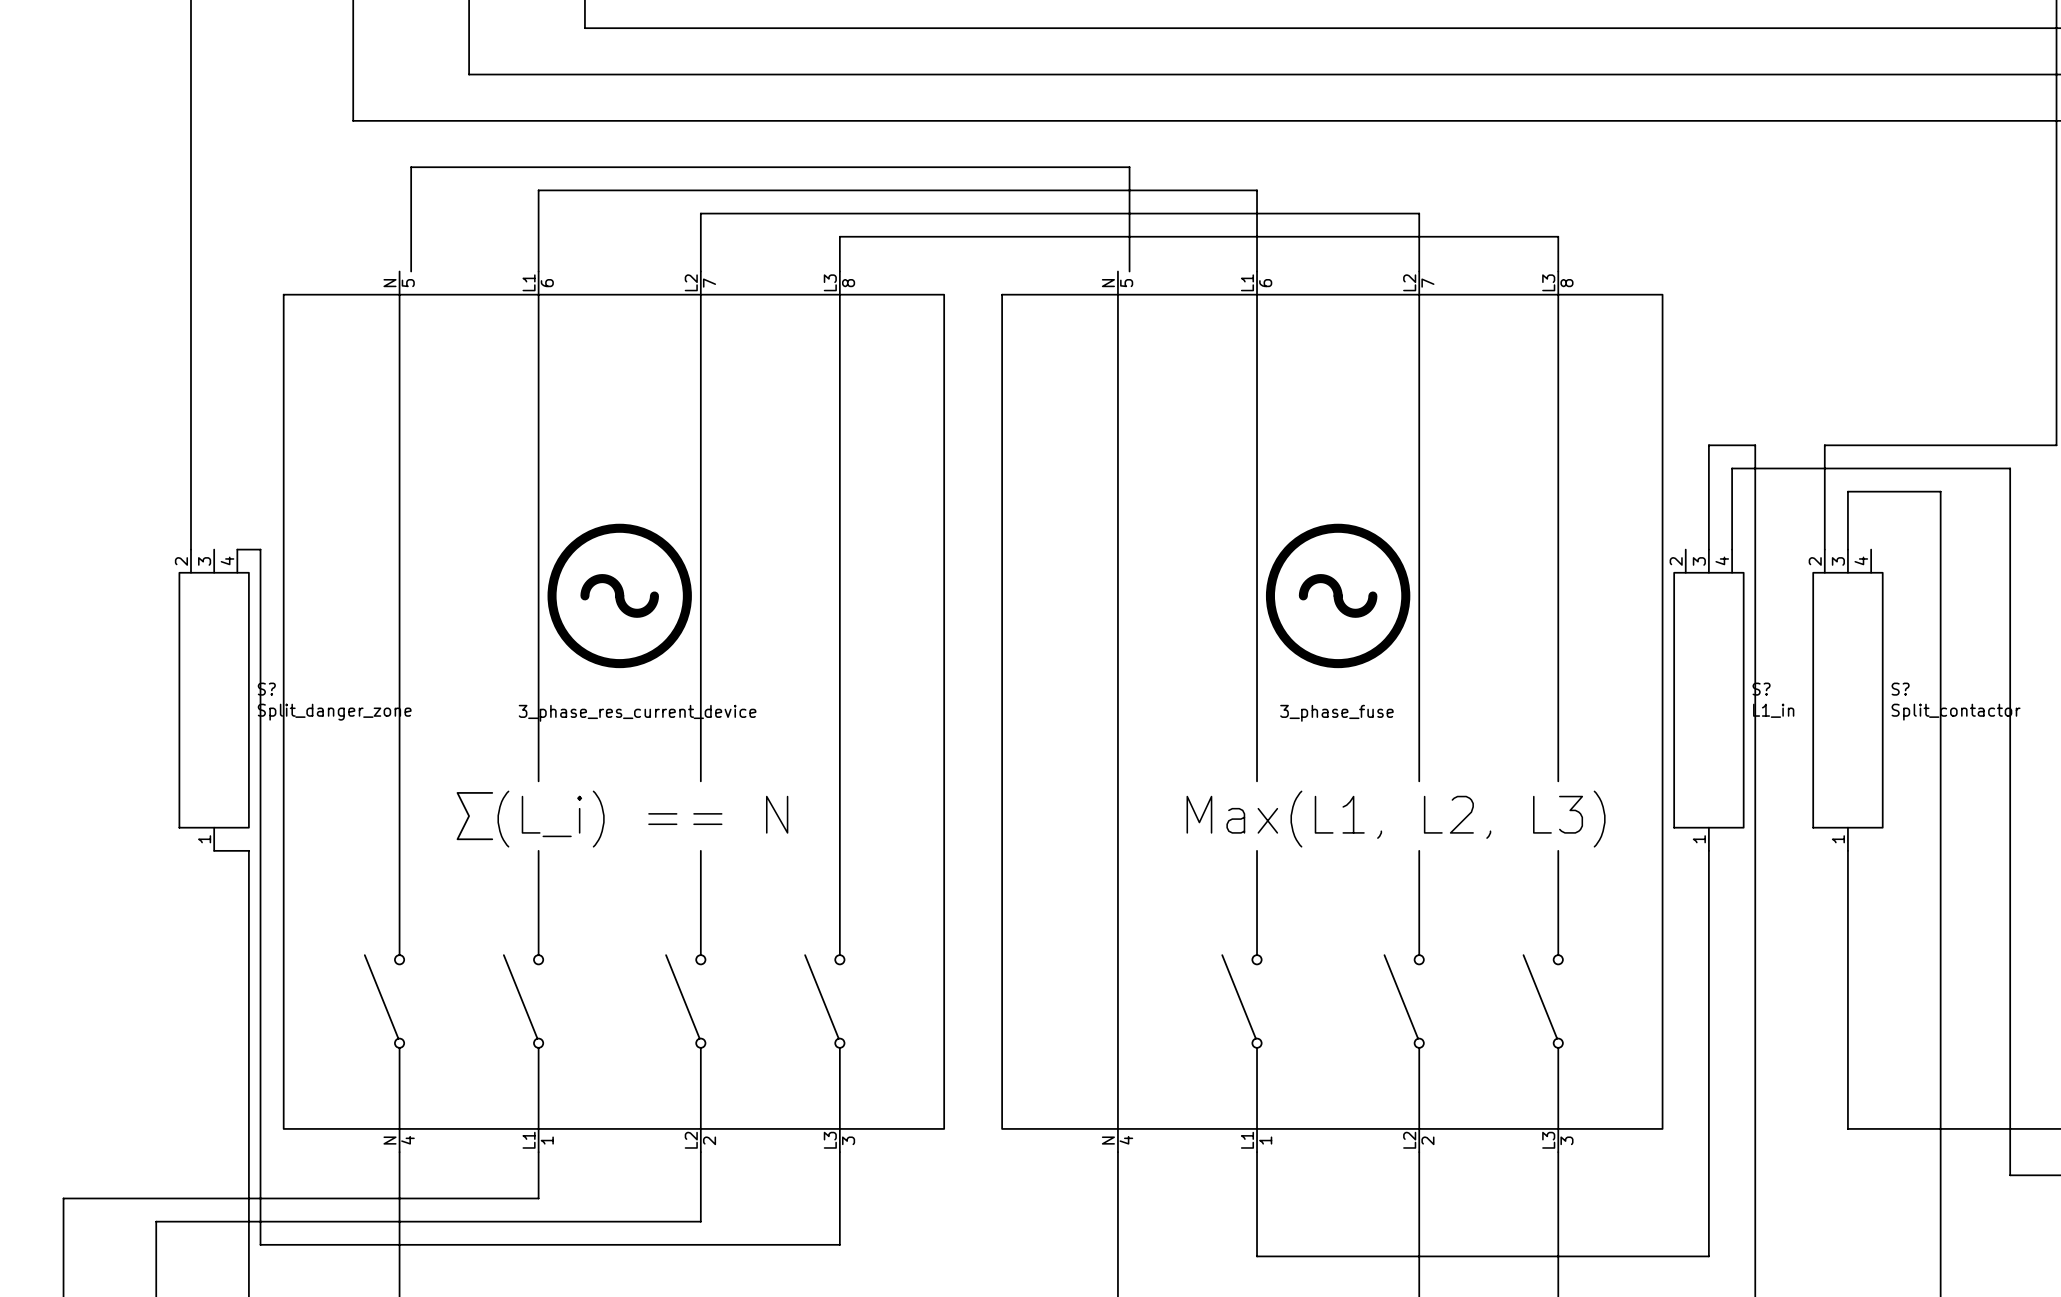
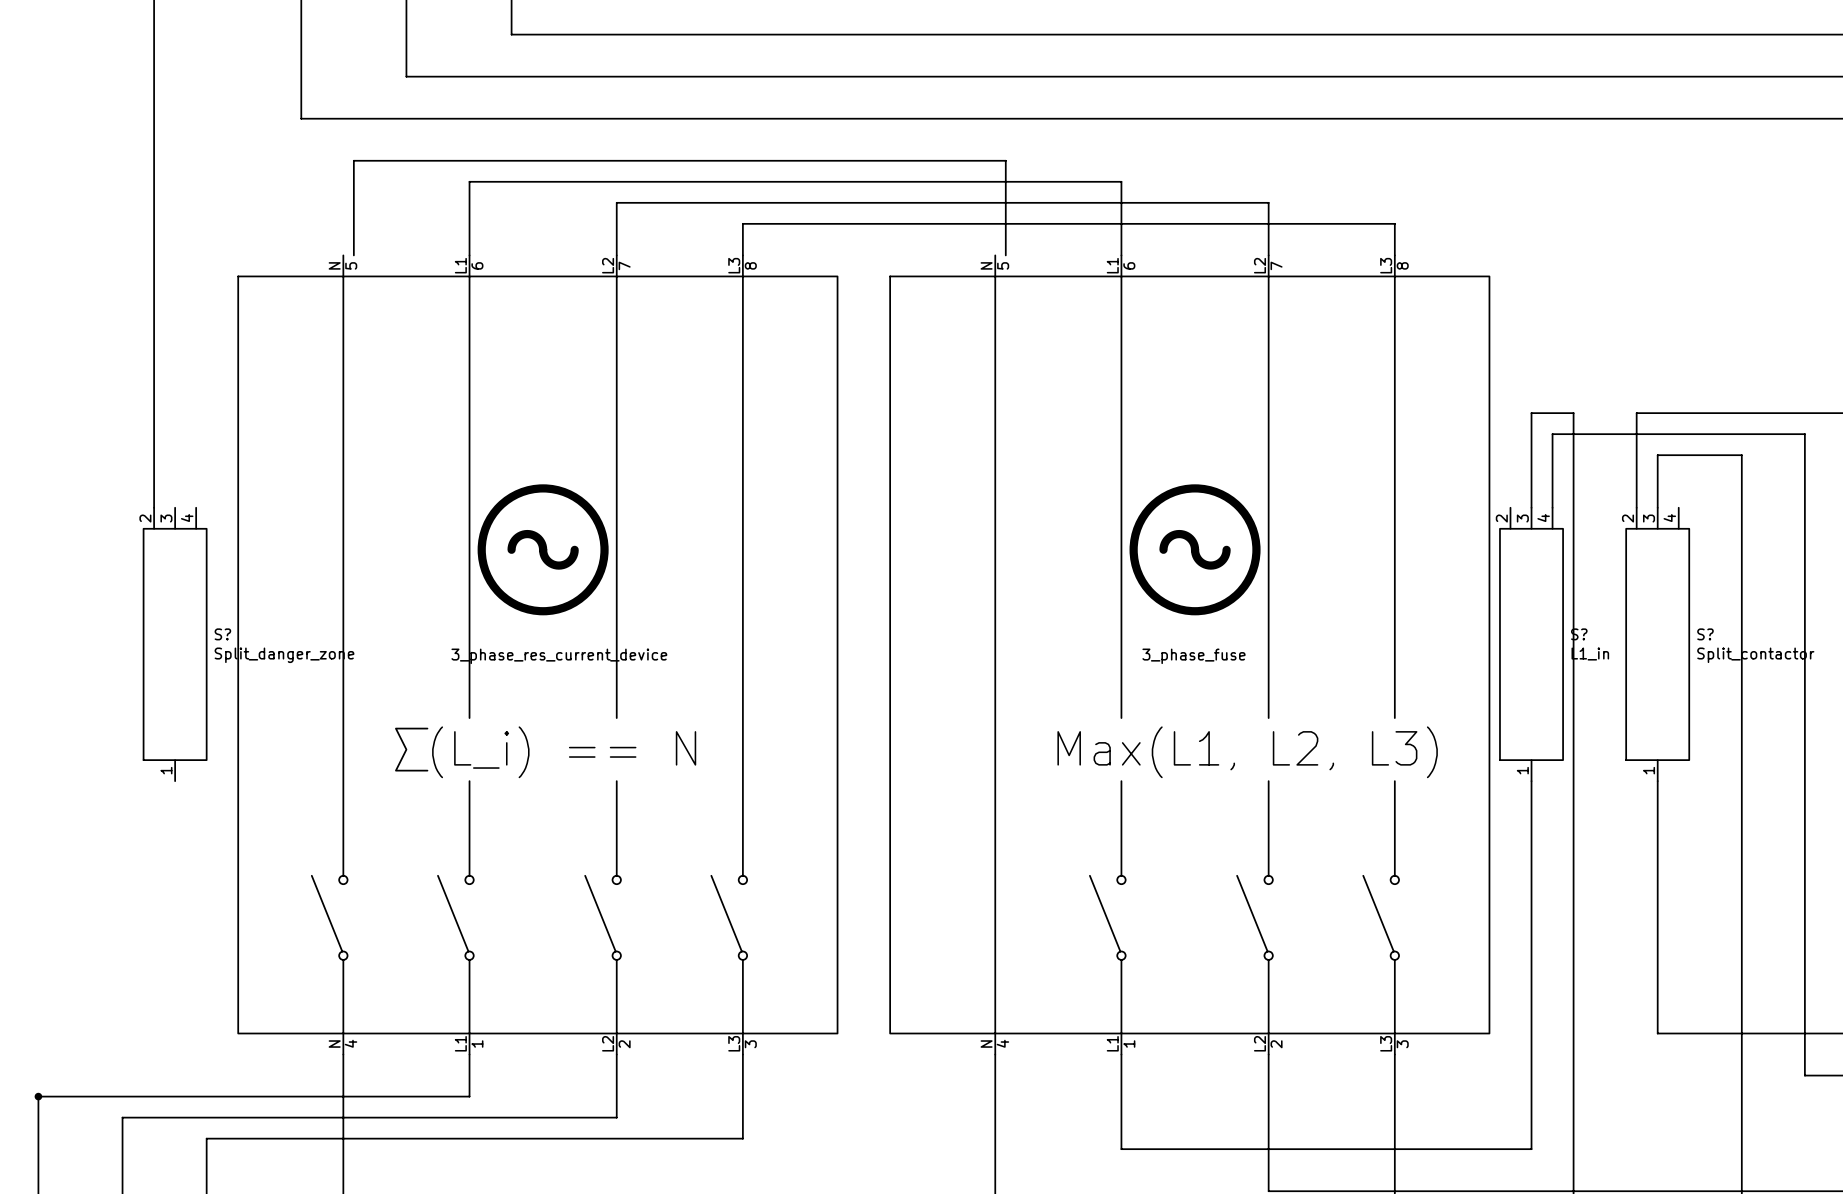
wire: (237, 549) (260, 549) (260, 1244) -> none
wire: (214, 850) (248, 850) (248, 1244) -> (217, 1138) (206, 1138)
junction: none -> (38, 1096)

